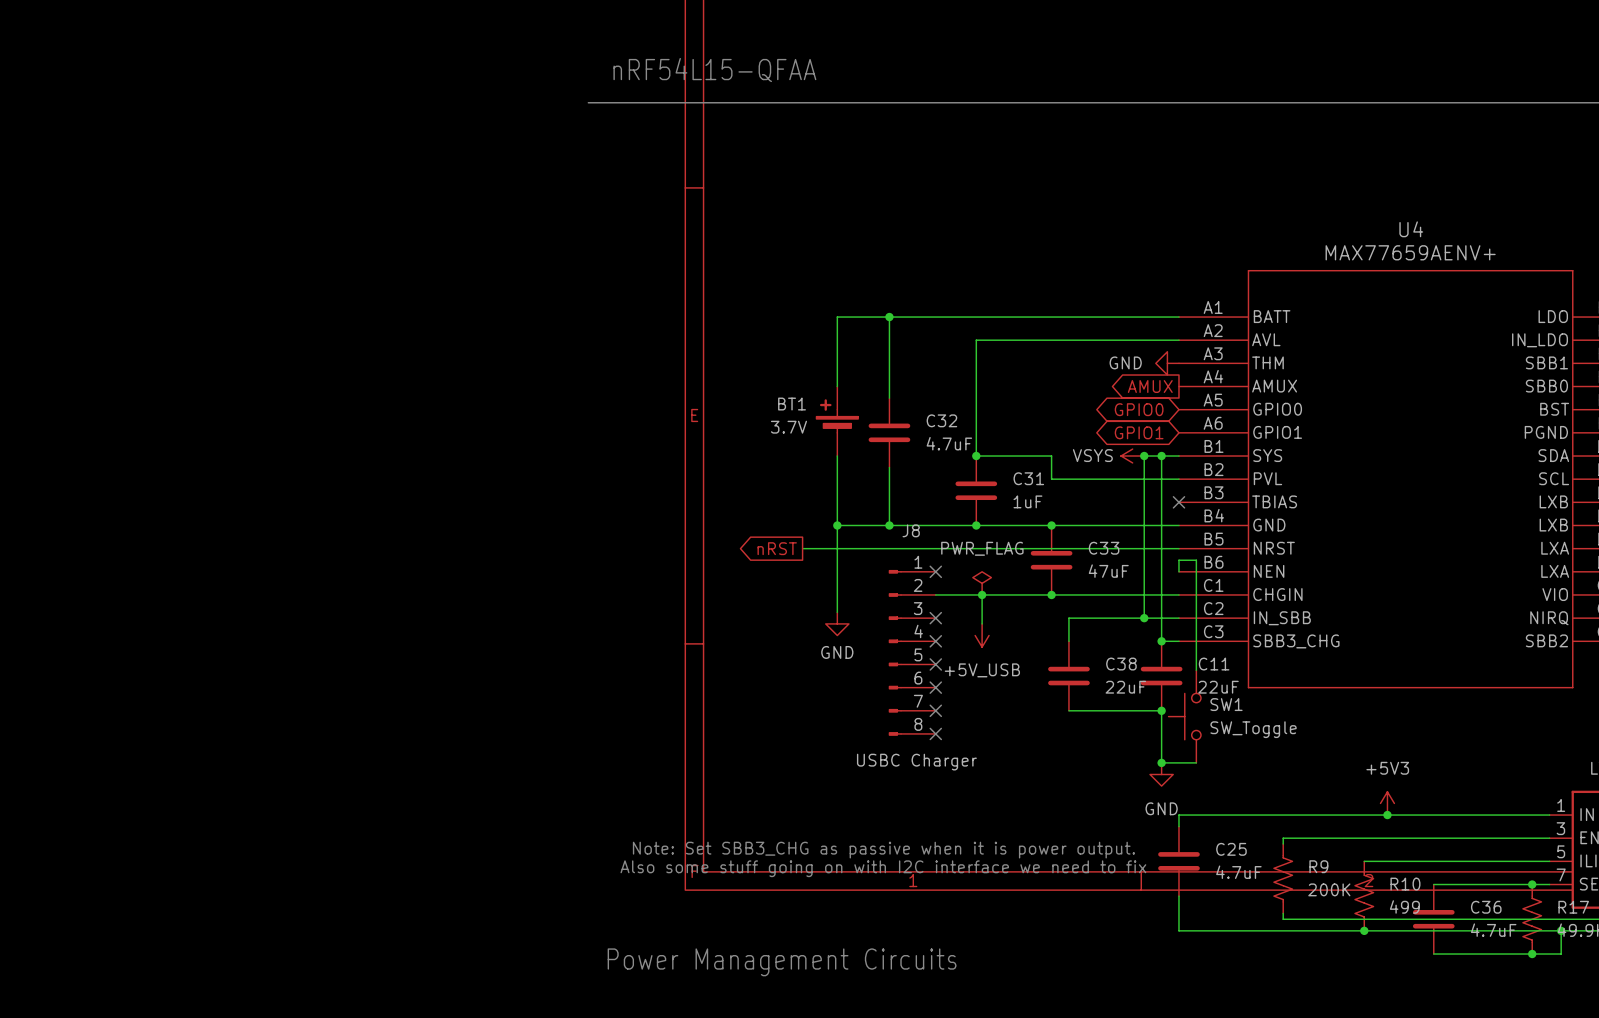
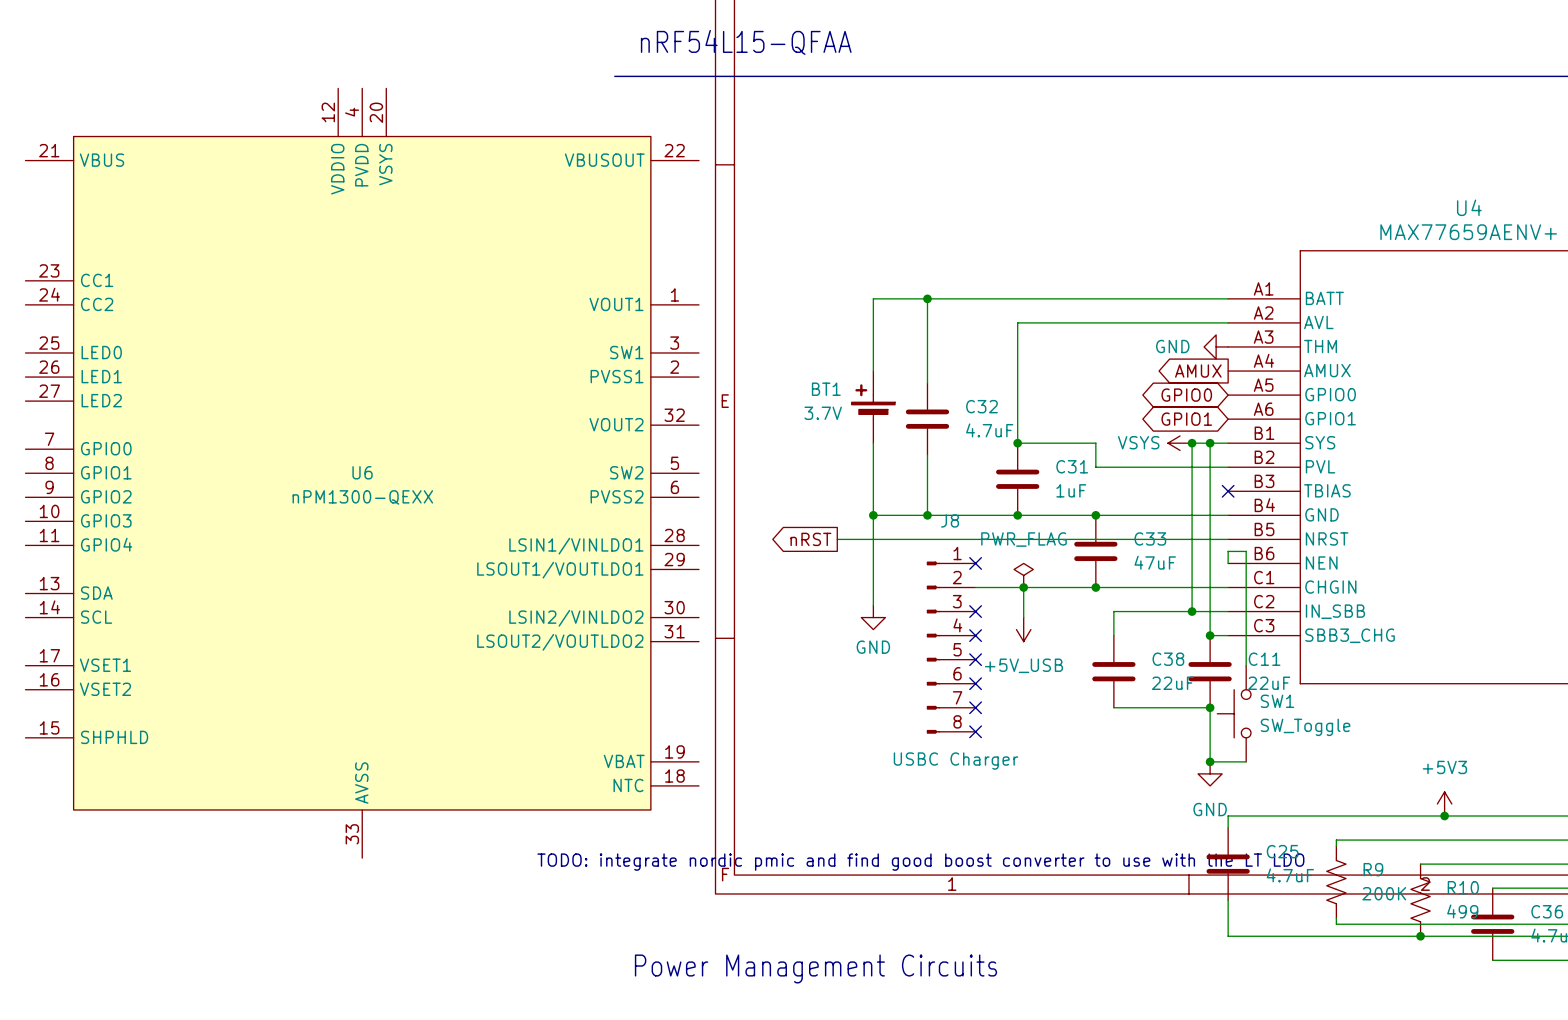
U6: none -> nPM1300-QEXX (362, 473)
text: Note: Set SBB3_CHG as passive when it is power output. (883, 850) -> none
text: none -> TODO: integrate nordic pmic and find good boost converter to use with the LT LDO (920, 862)
text: Also some stuff going on with I2C interface we need to fix (883, 868) -> none

